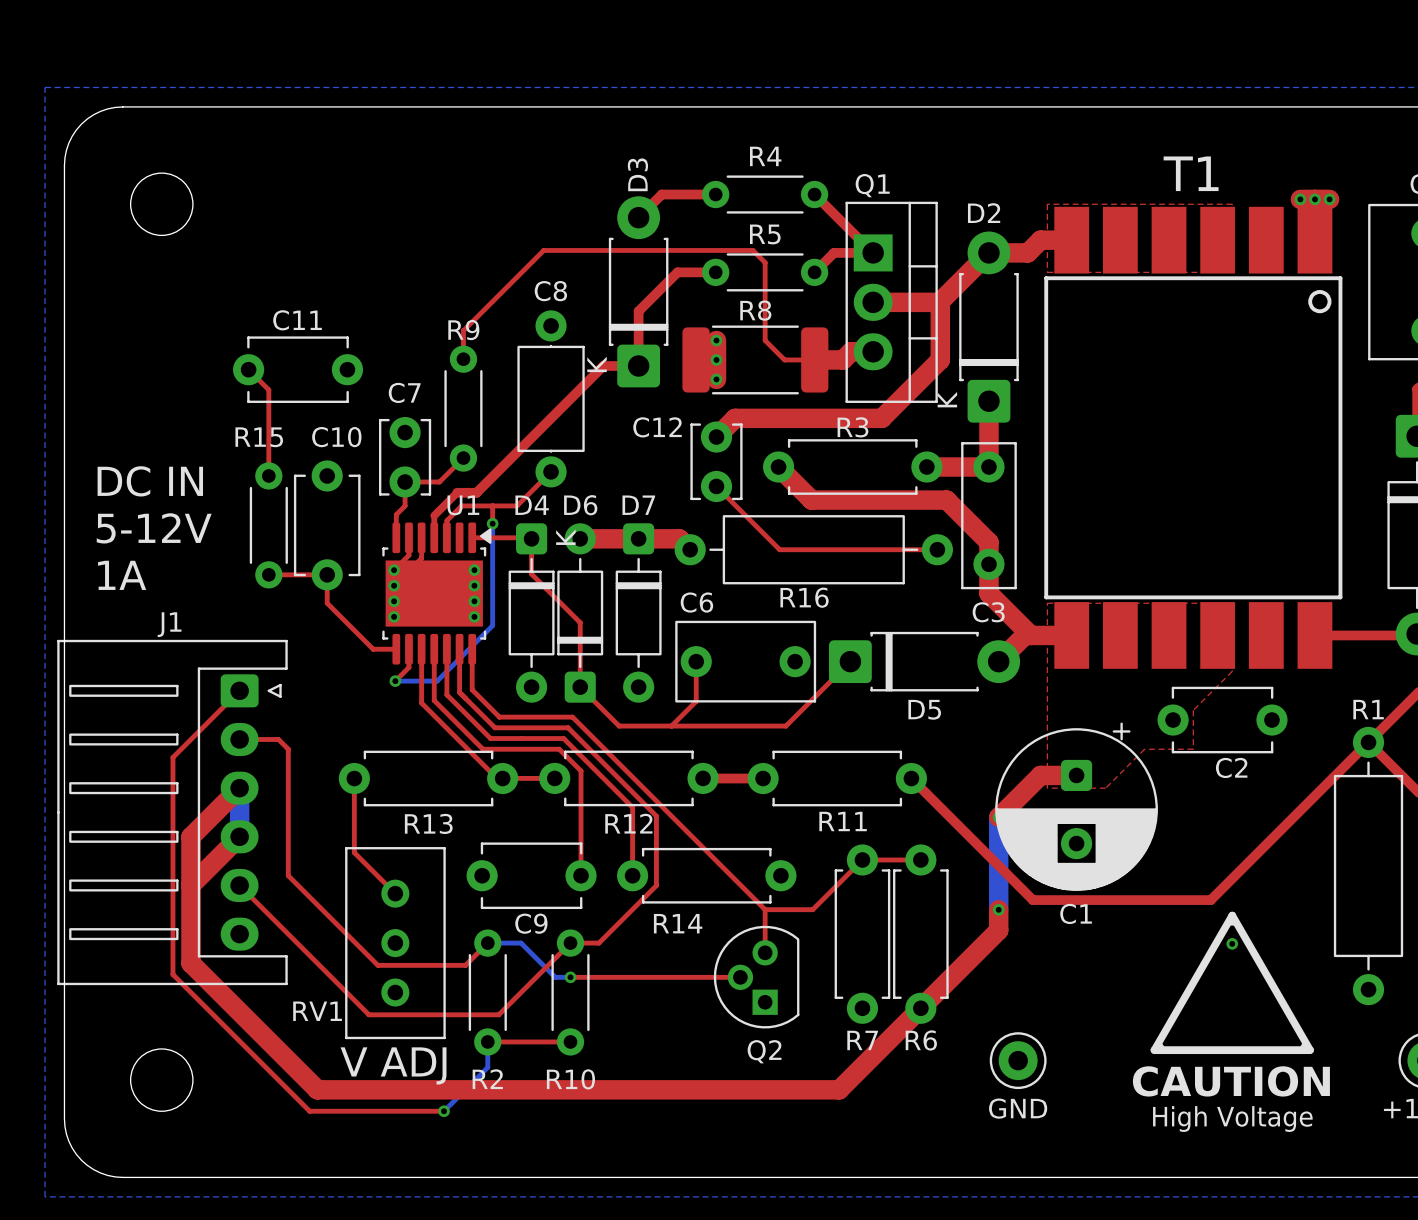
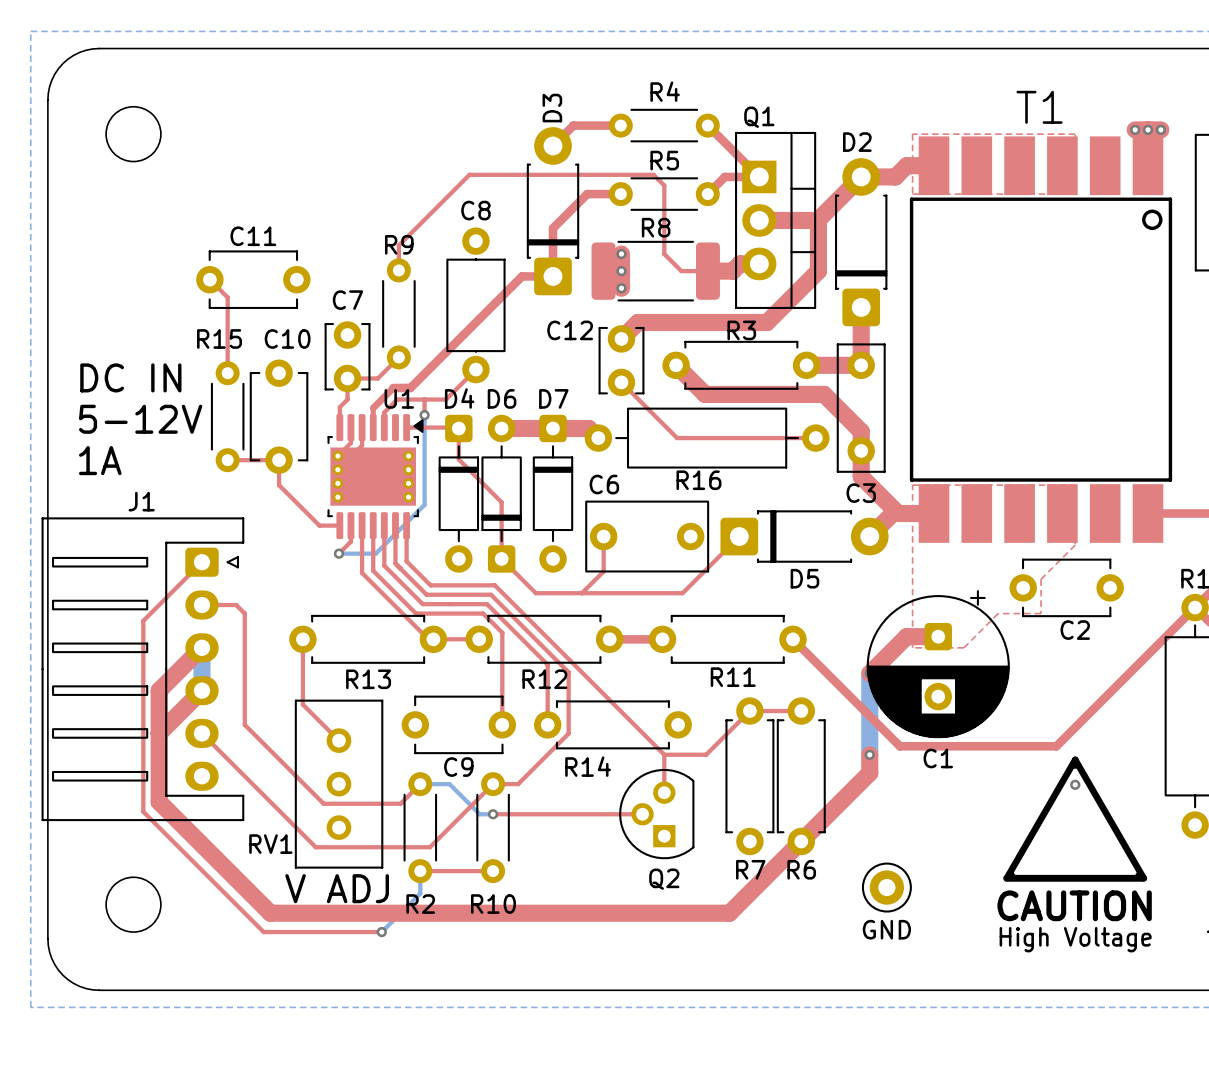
D3 text: K (597, 364) -> none
D2 text: K (947, 399) -> none
D4 text: K (565, 537) -> none

